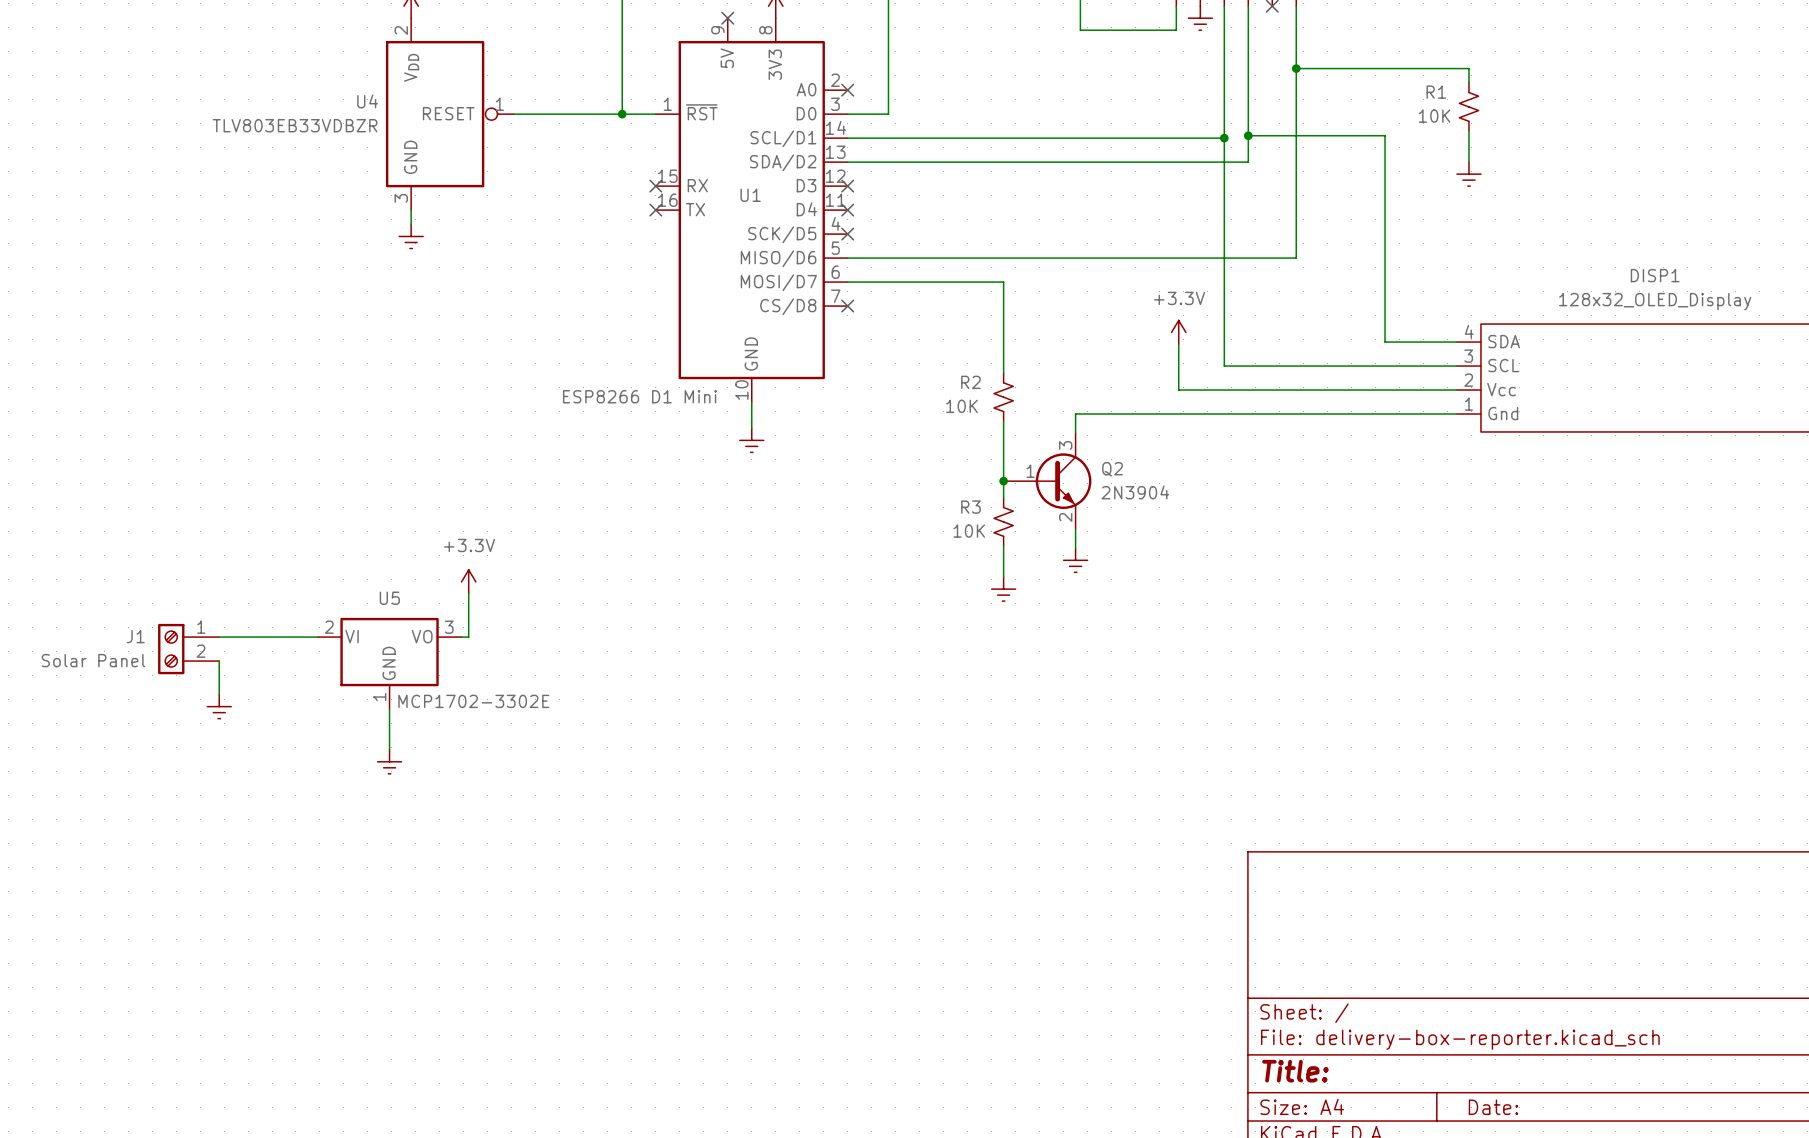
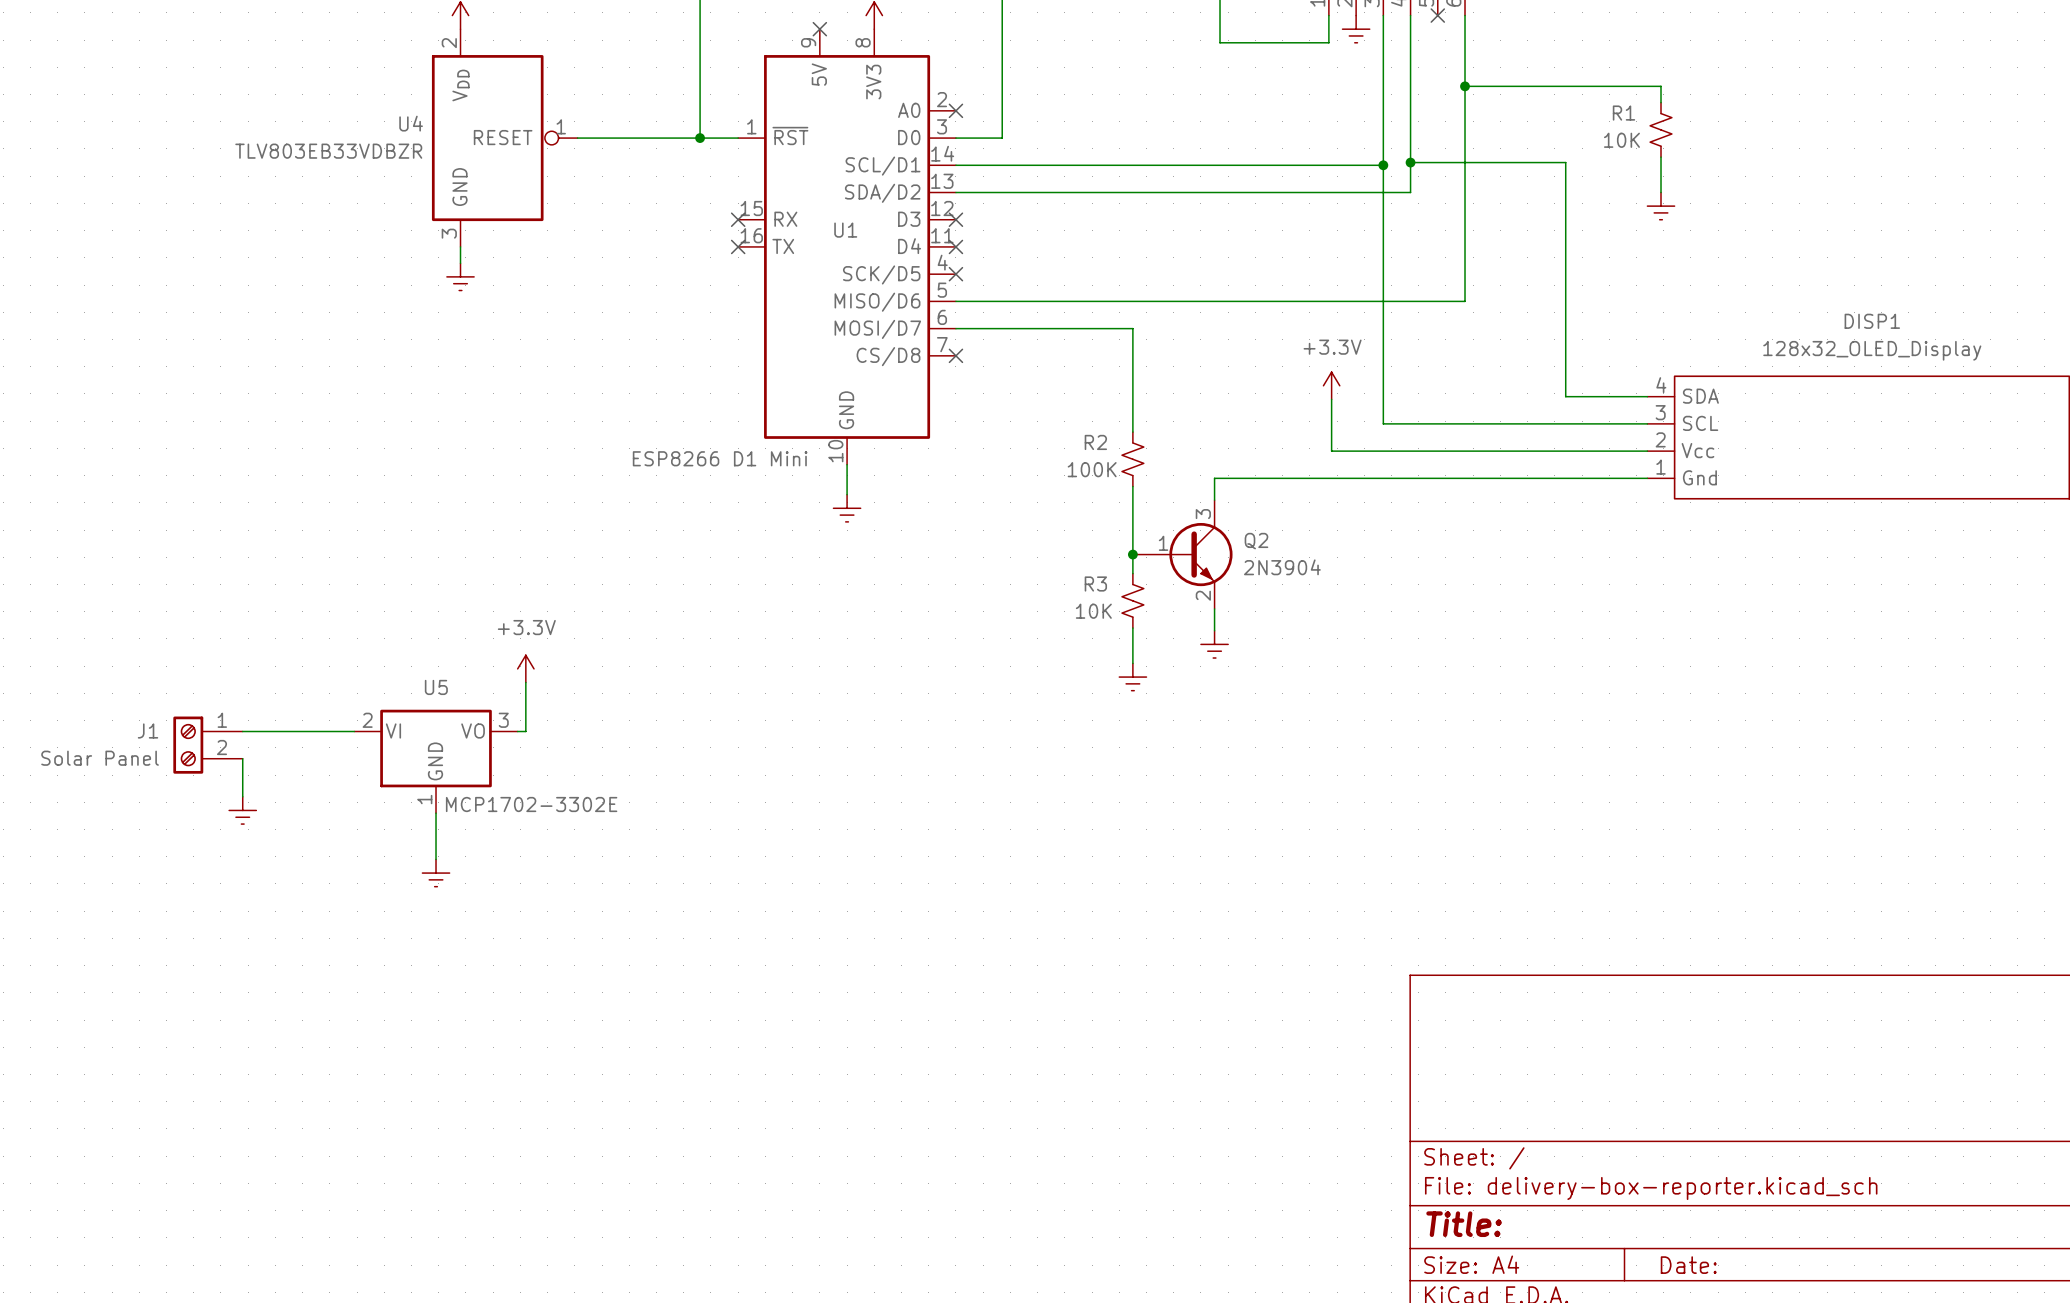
R2 value: 10K (962, 406) -> 100K (1092, 469)

